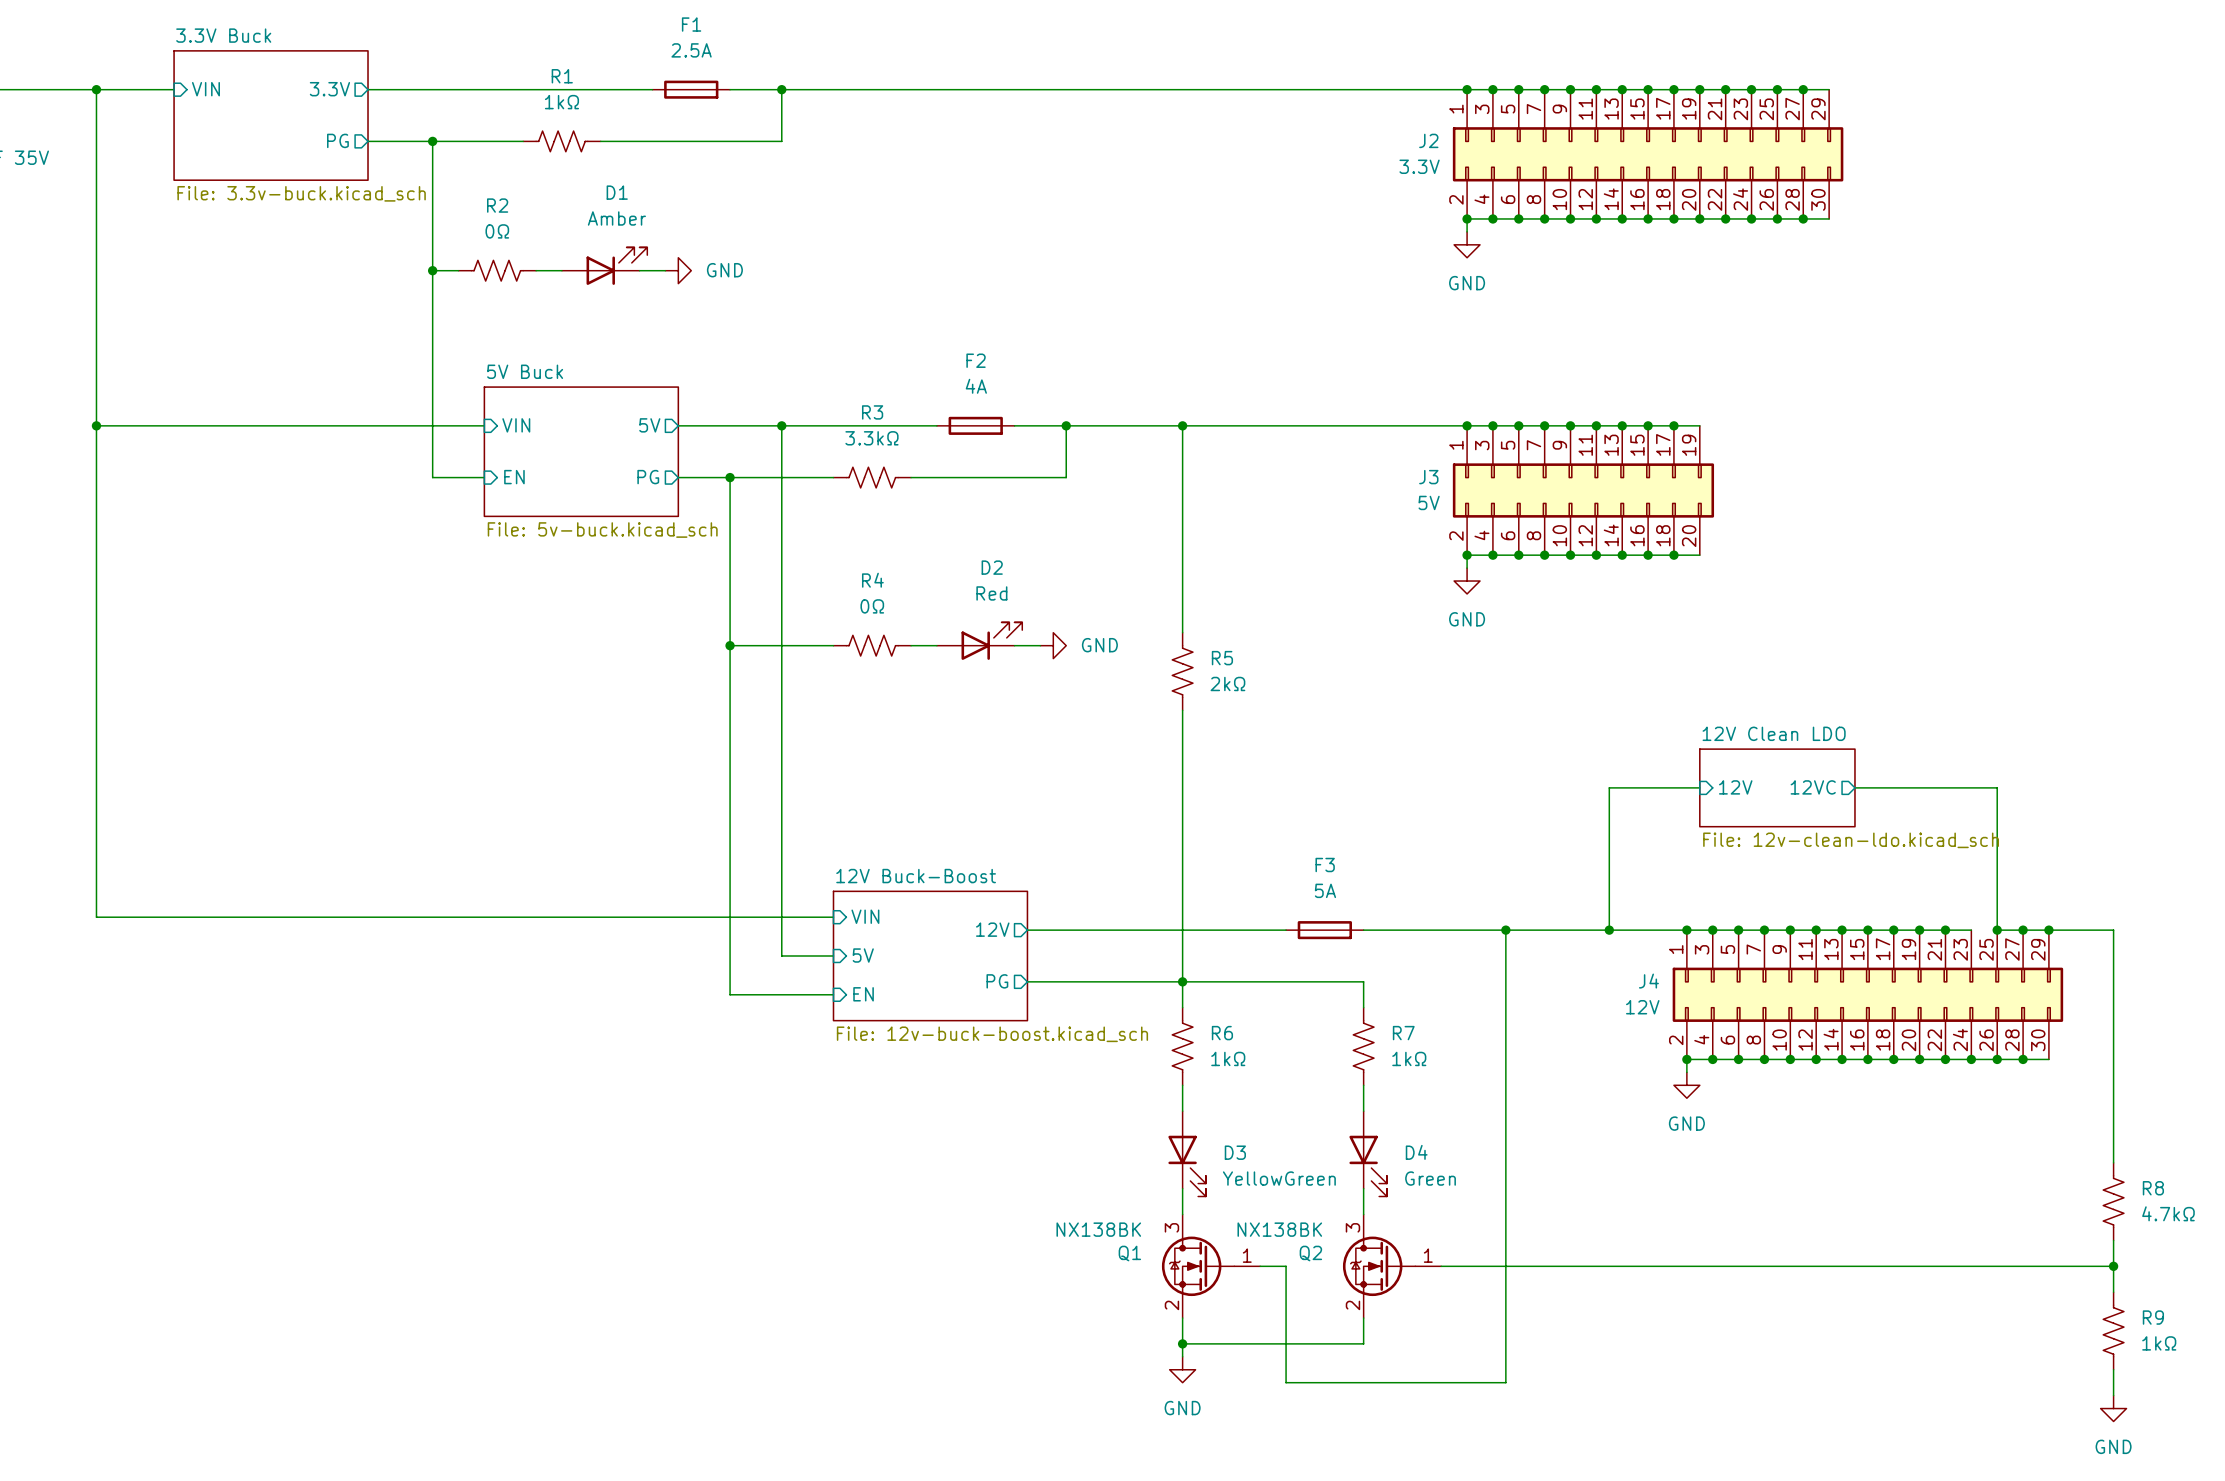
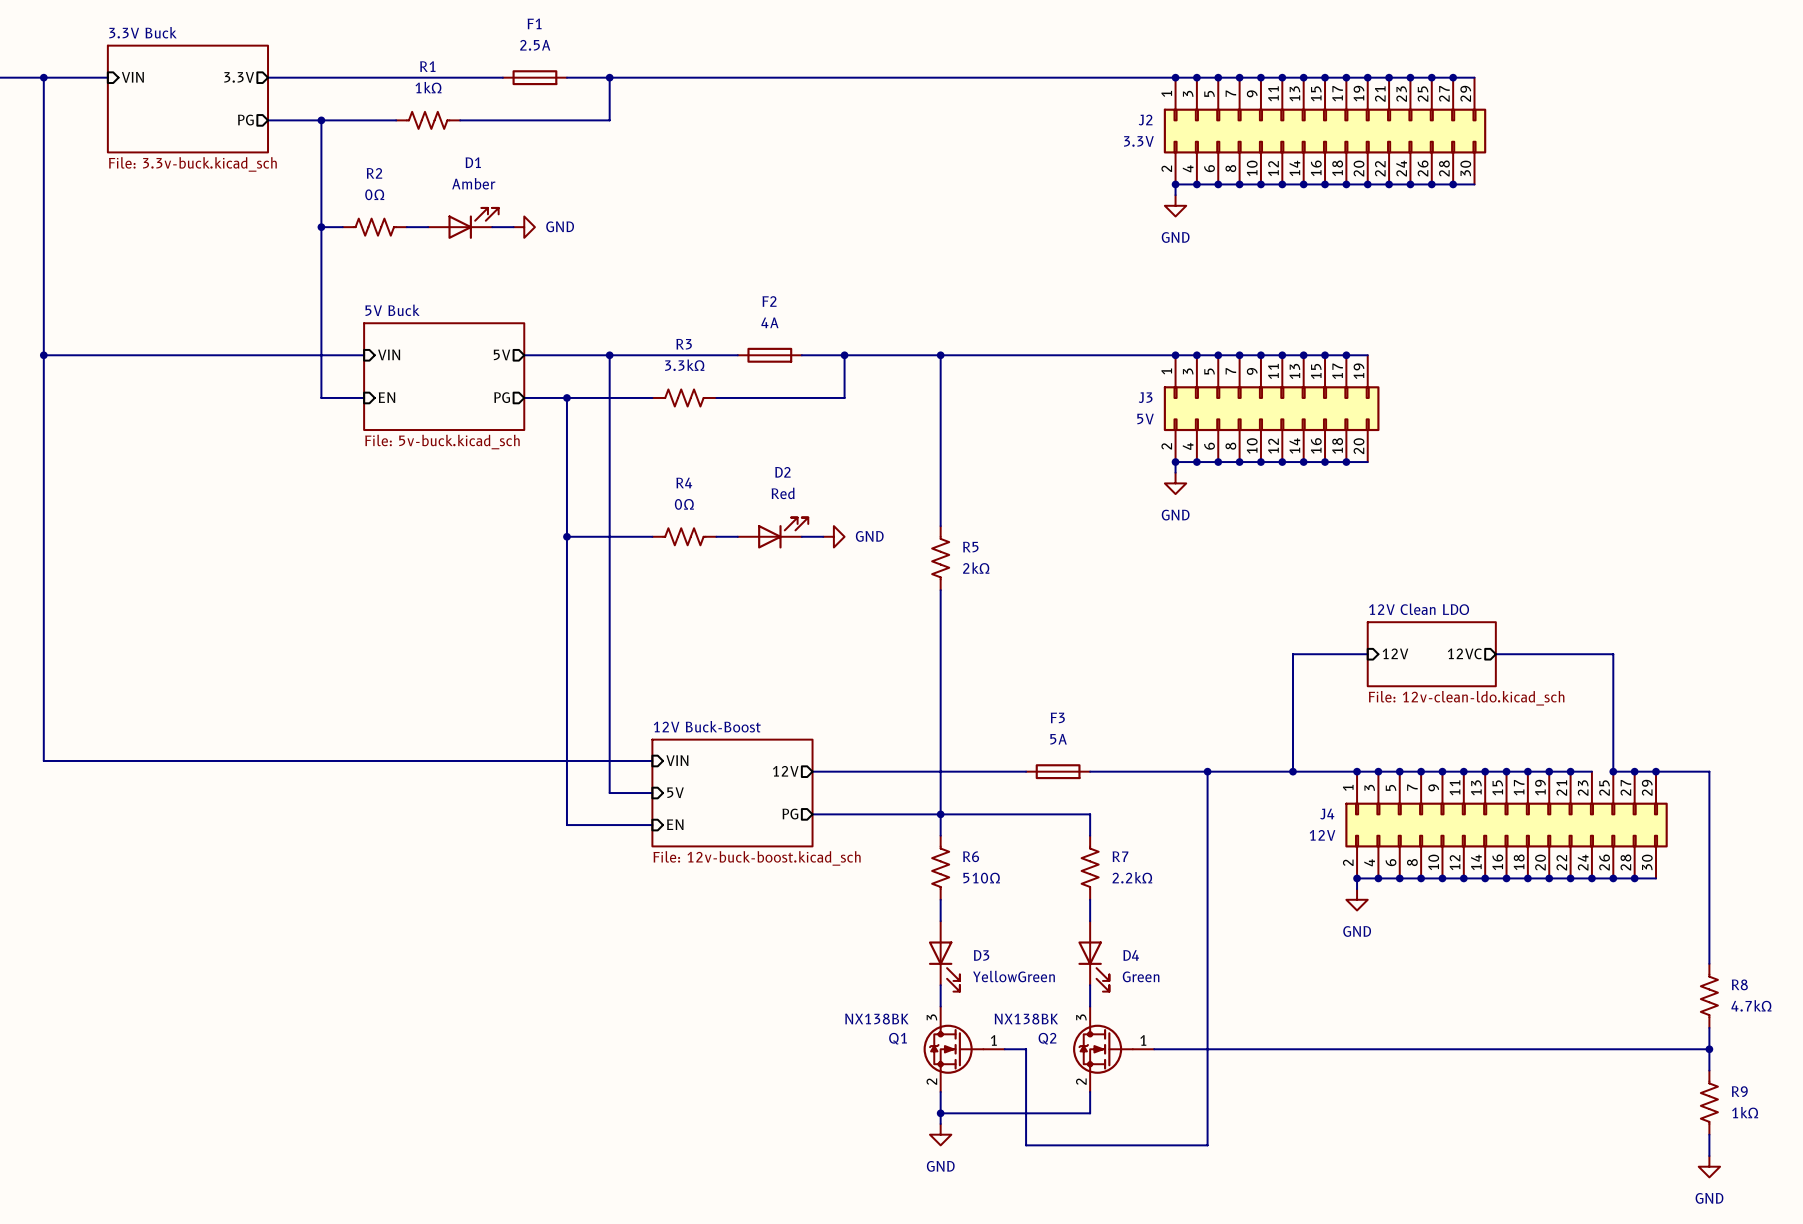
R6 value: 1kΩ (1228, 1058) -> 510Ω (981, 878)
R7 value: 1kΩ (1409, 1058) -> 2.2kΩ (1132, 877)

